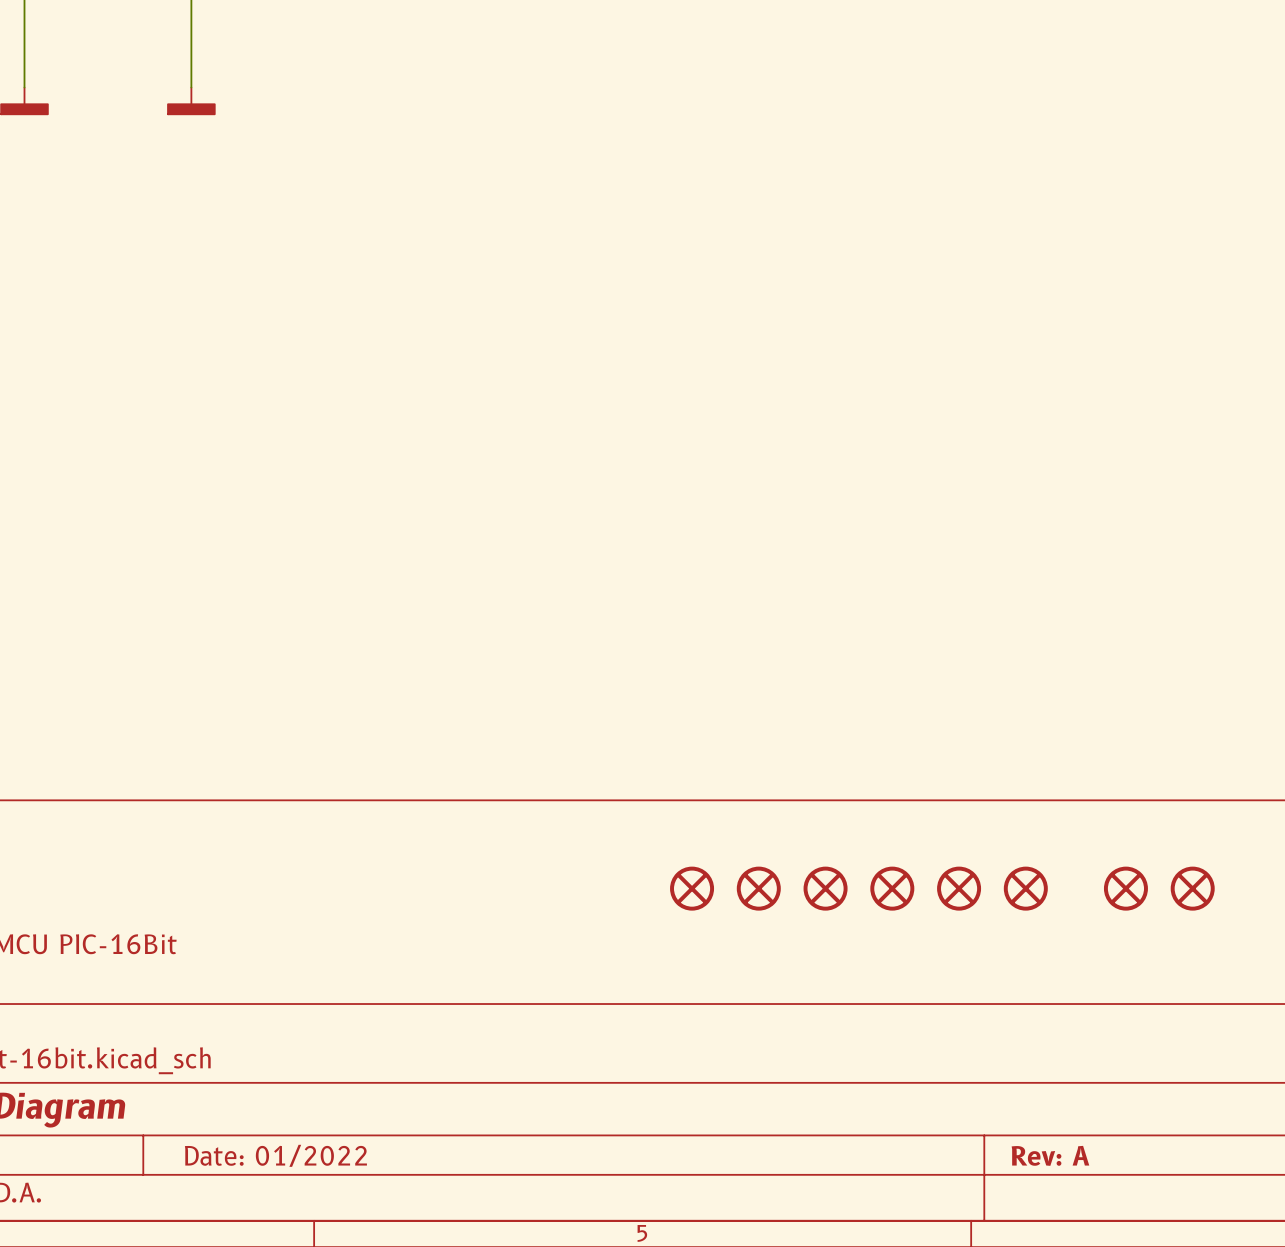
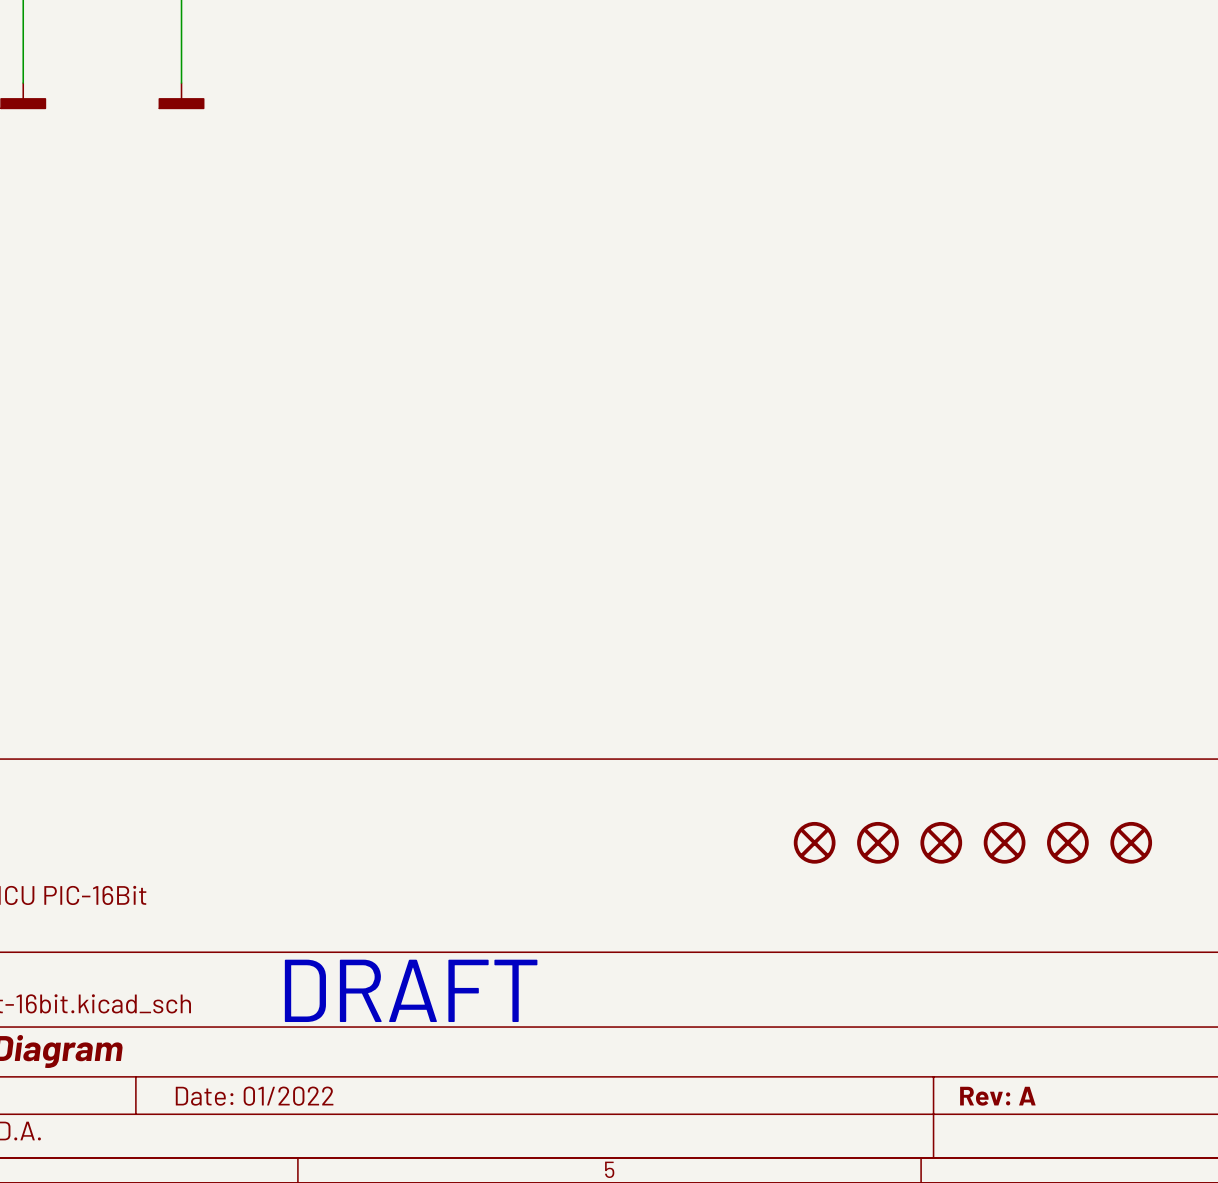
part: (692, 888) -> none
part: (758, 888) -> none
part: (825, 888) -> none
part: none -> (814, 842)
part: (892, 888) -> none
part: none -> (877, 842)
part: (959, 888) -> none
part: none -> (941, 842)
part: (1025, 888) -> none
part: none -> (1004, 842)
text: none -> DRAFT (411, 990)

